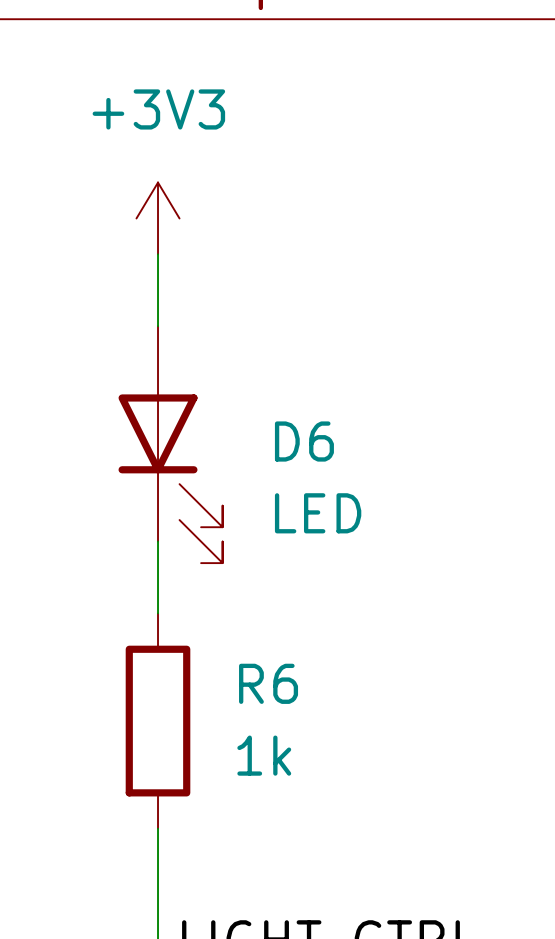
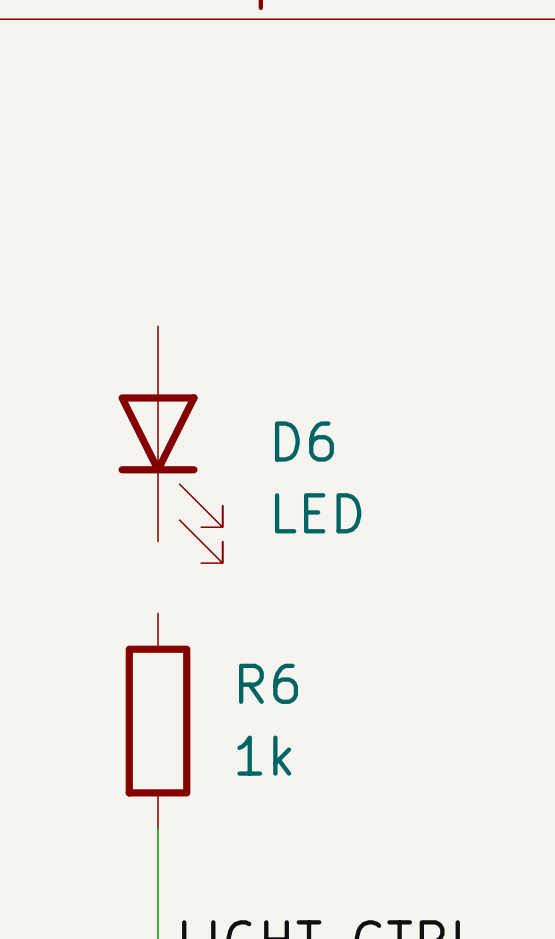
power symbol: +3V3 (158, 218) -> none
wire: (158, 254) (158, 326) -> none
wire: (158, 541) (158, 613) -> none

